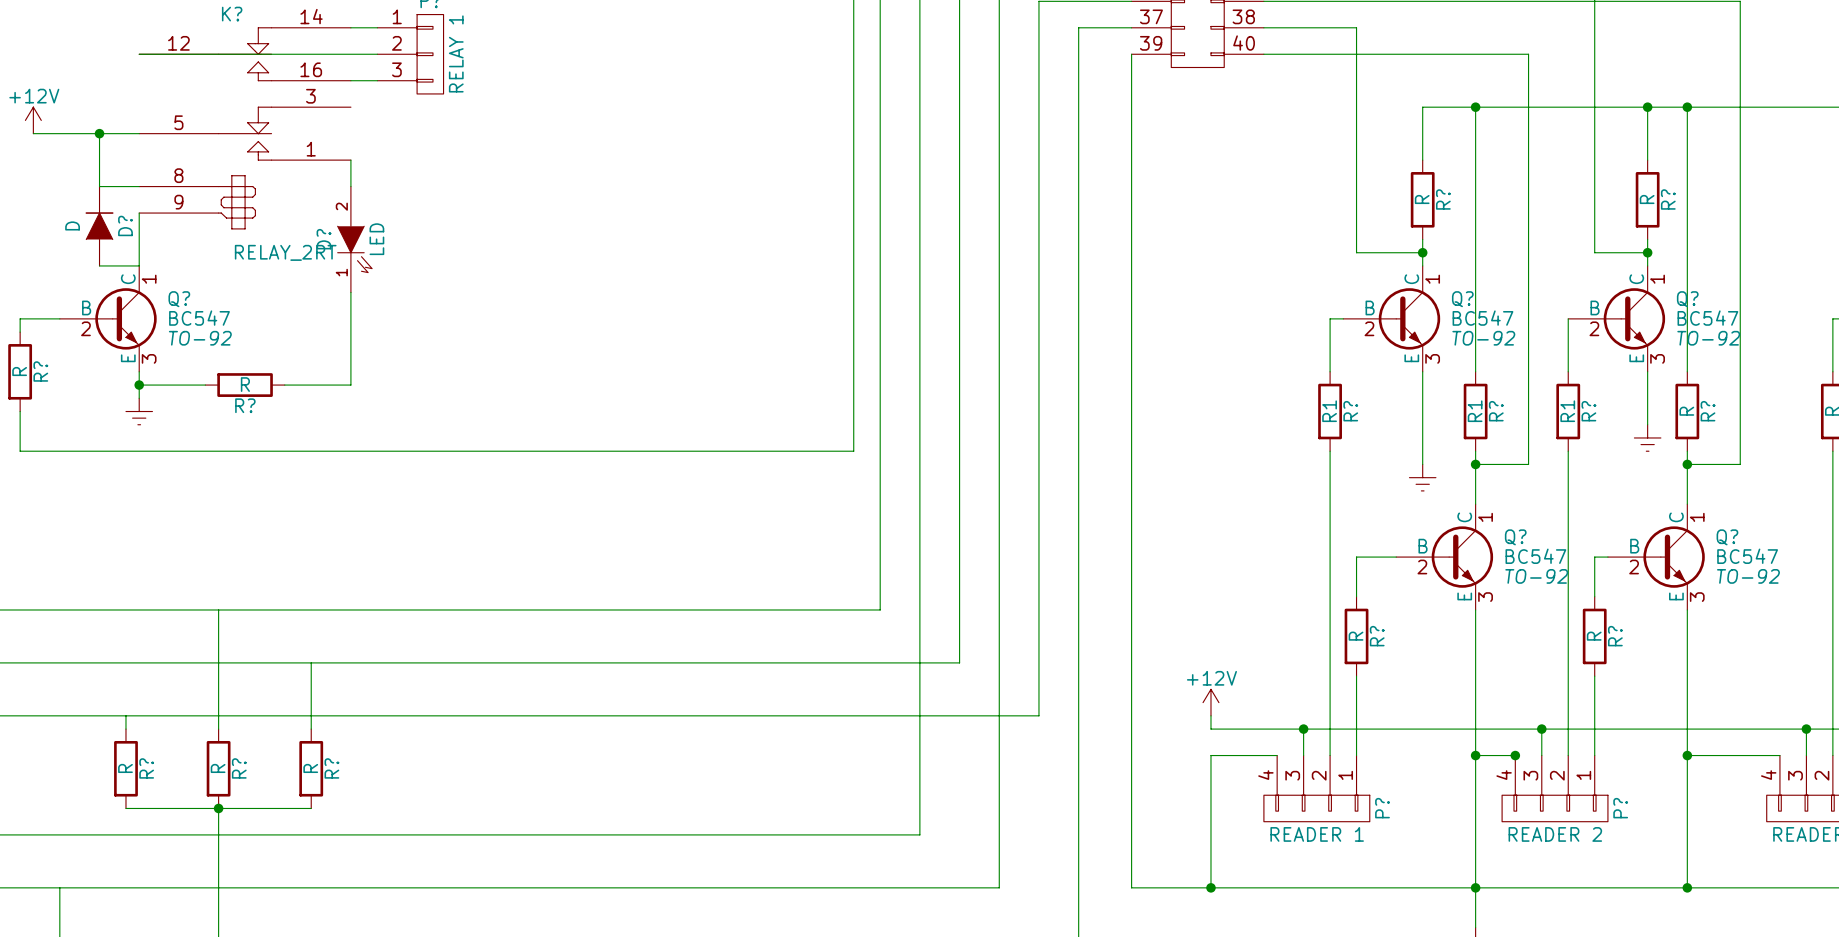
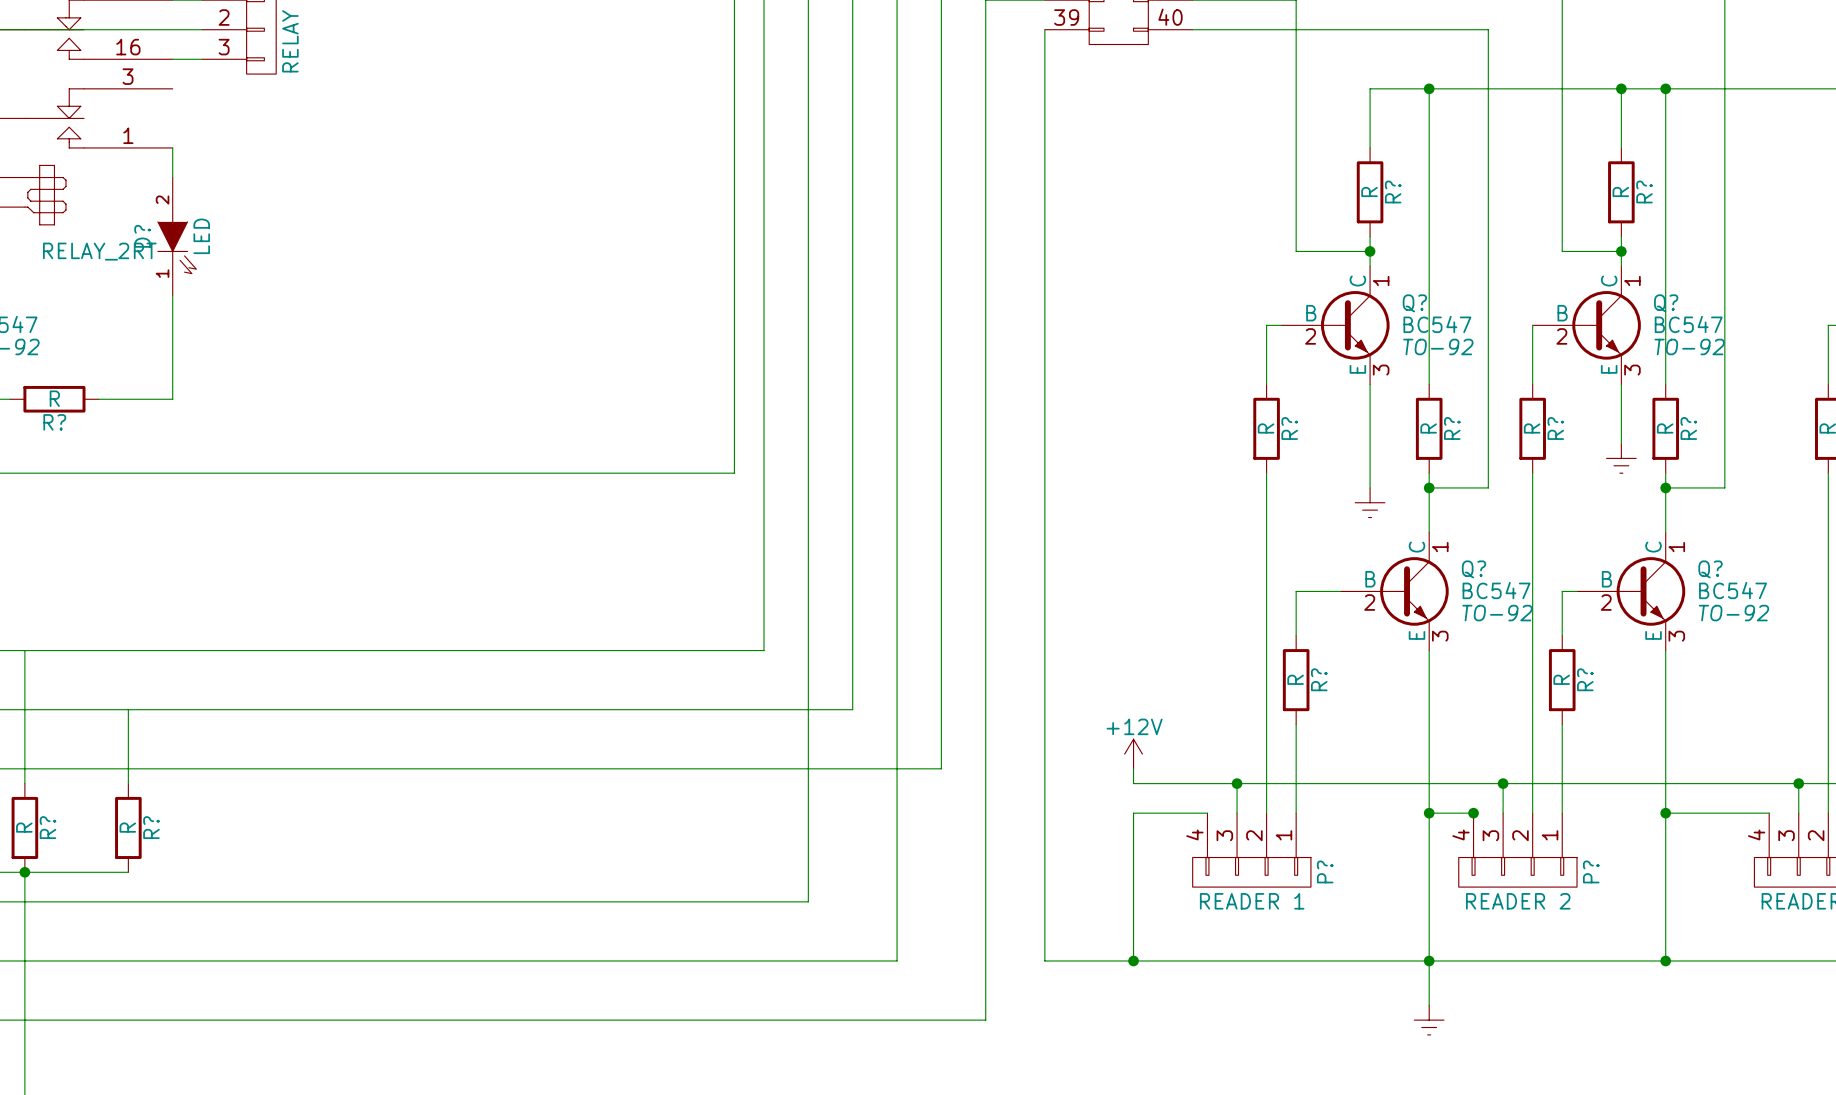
R? value: R1 (1329, 411) -> R (1266, 428)
R? value: R1 (1475, 411) -> R (1428, 428)
R? value: R1 (1567, 411) -> R (1532, 428)

